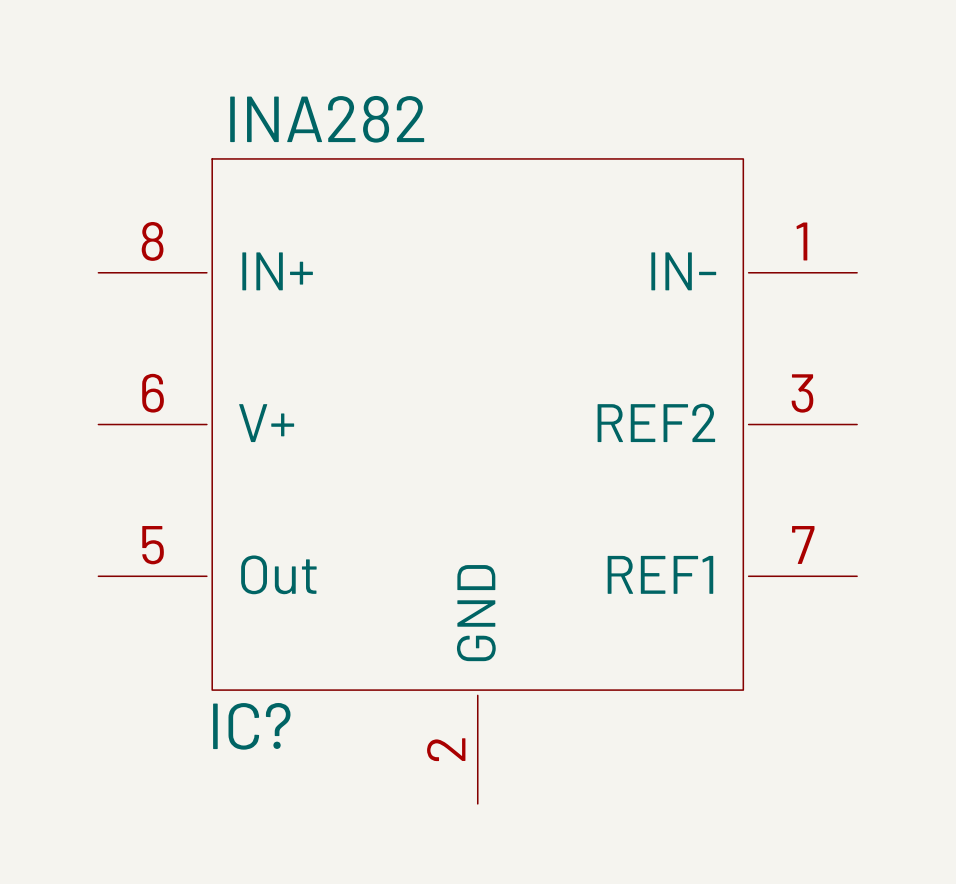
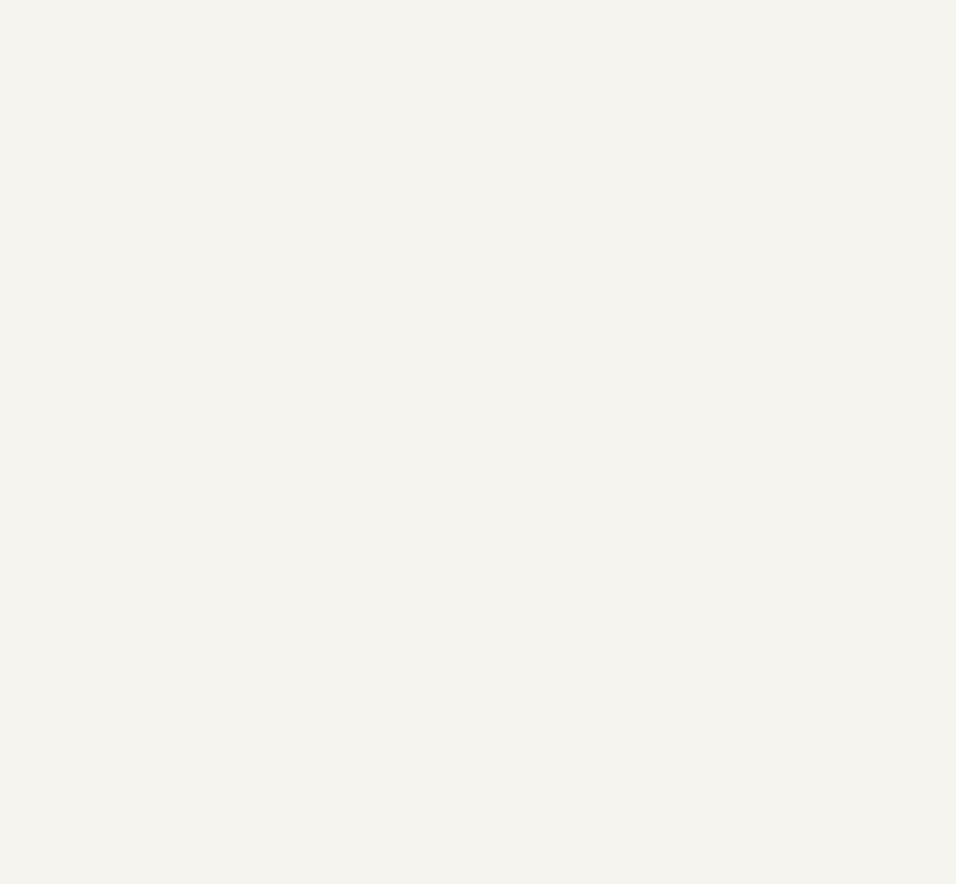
IC?: INA282 (477, 481) -> none

